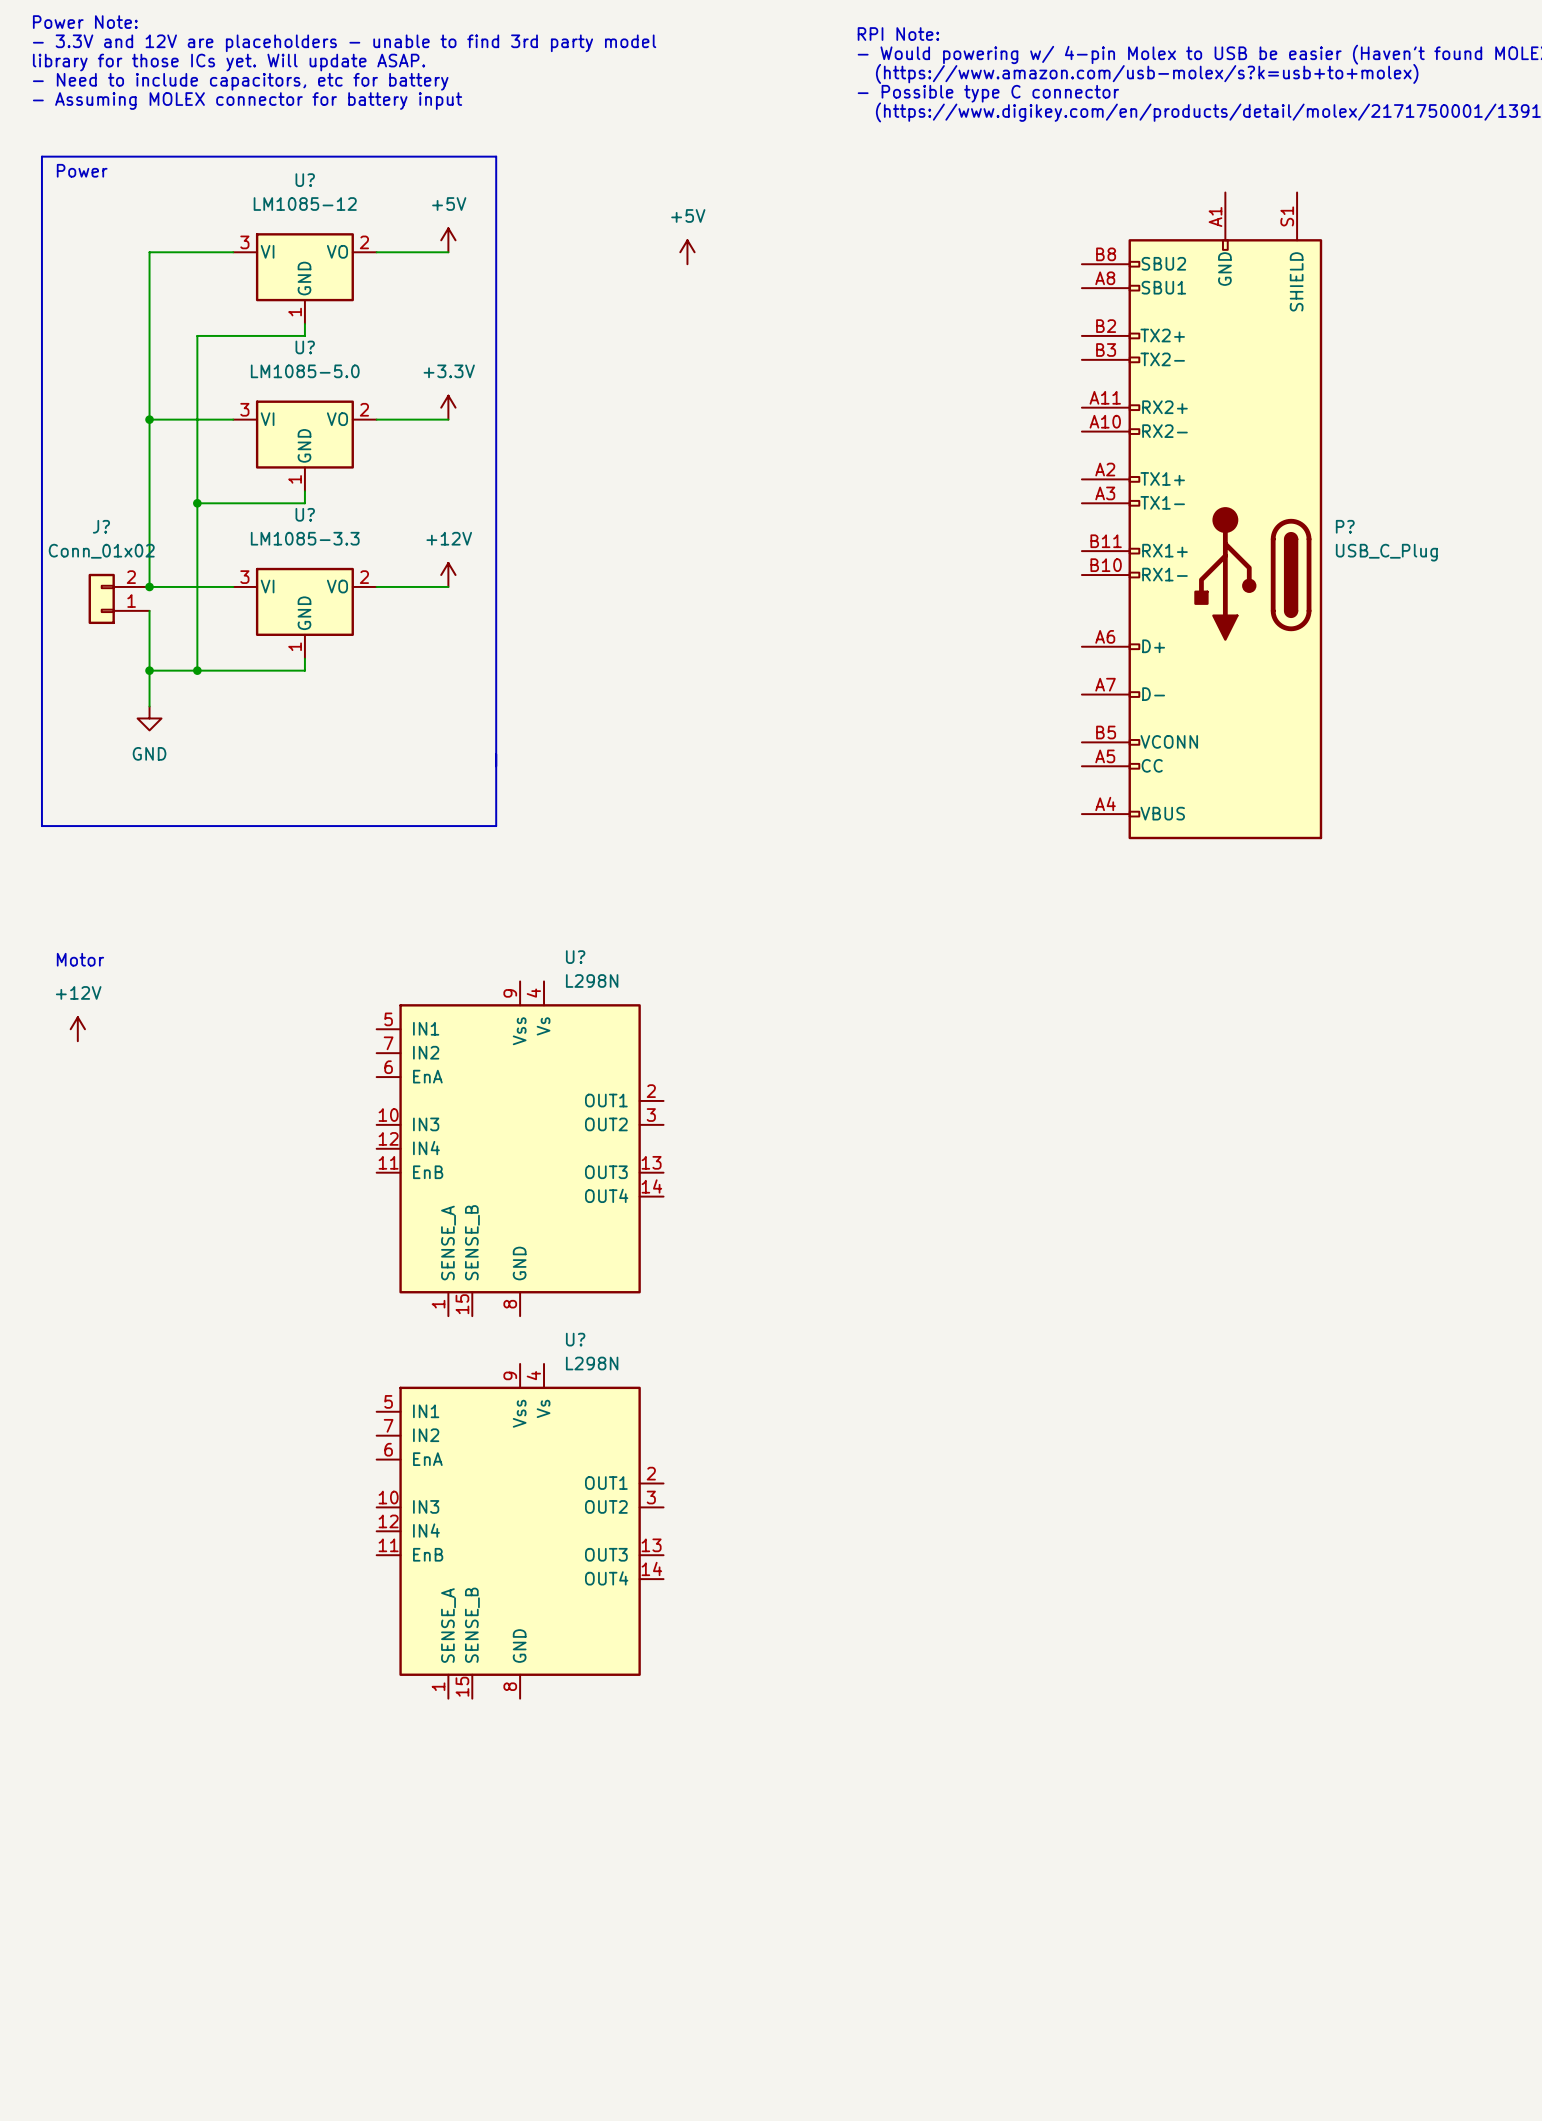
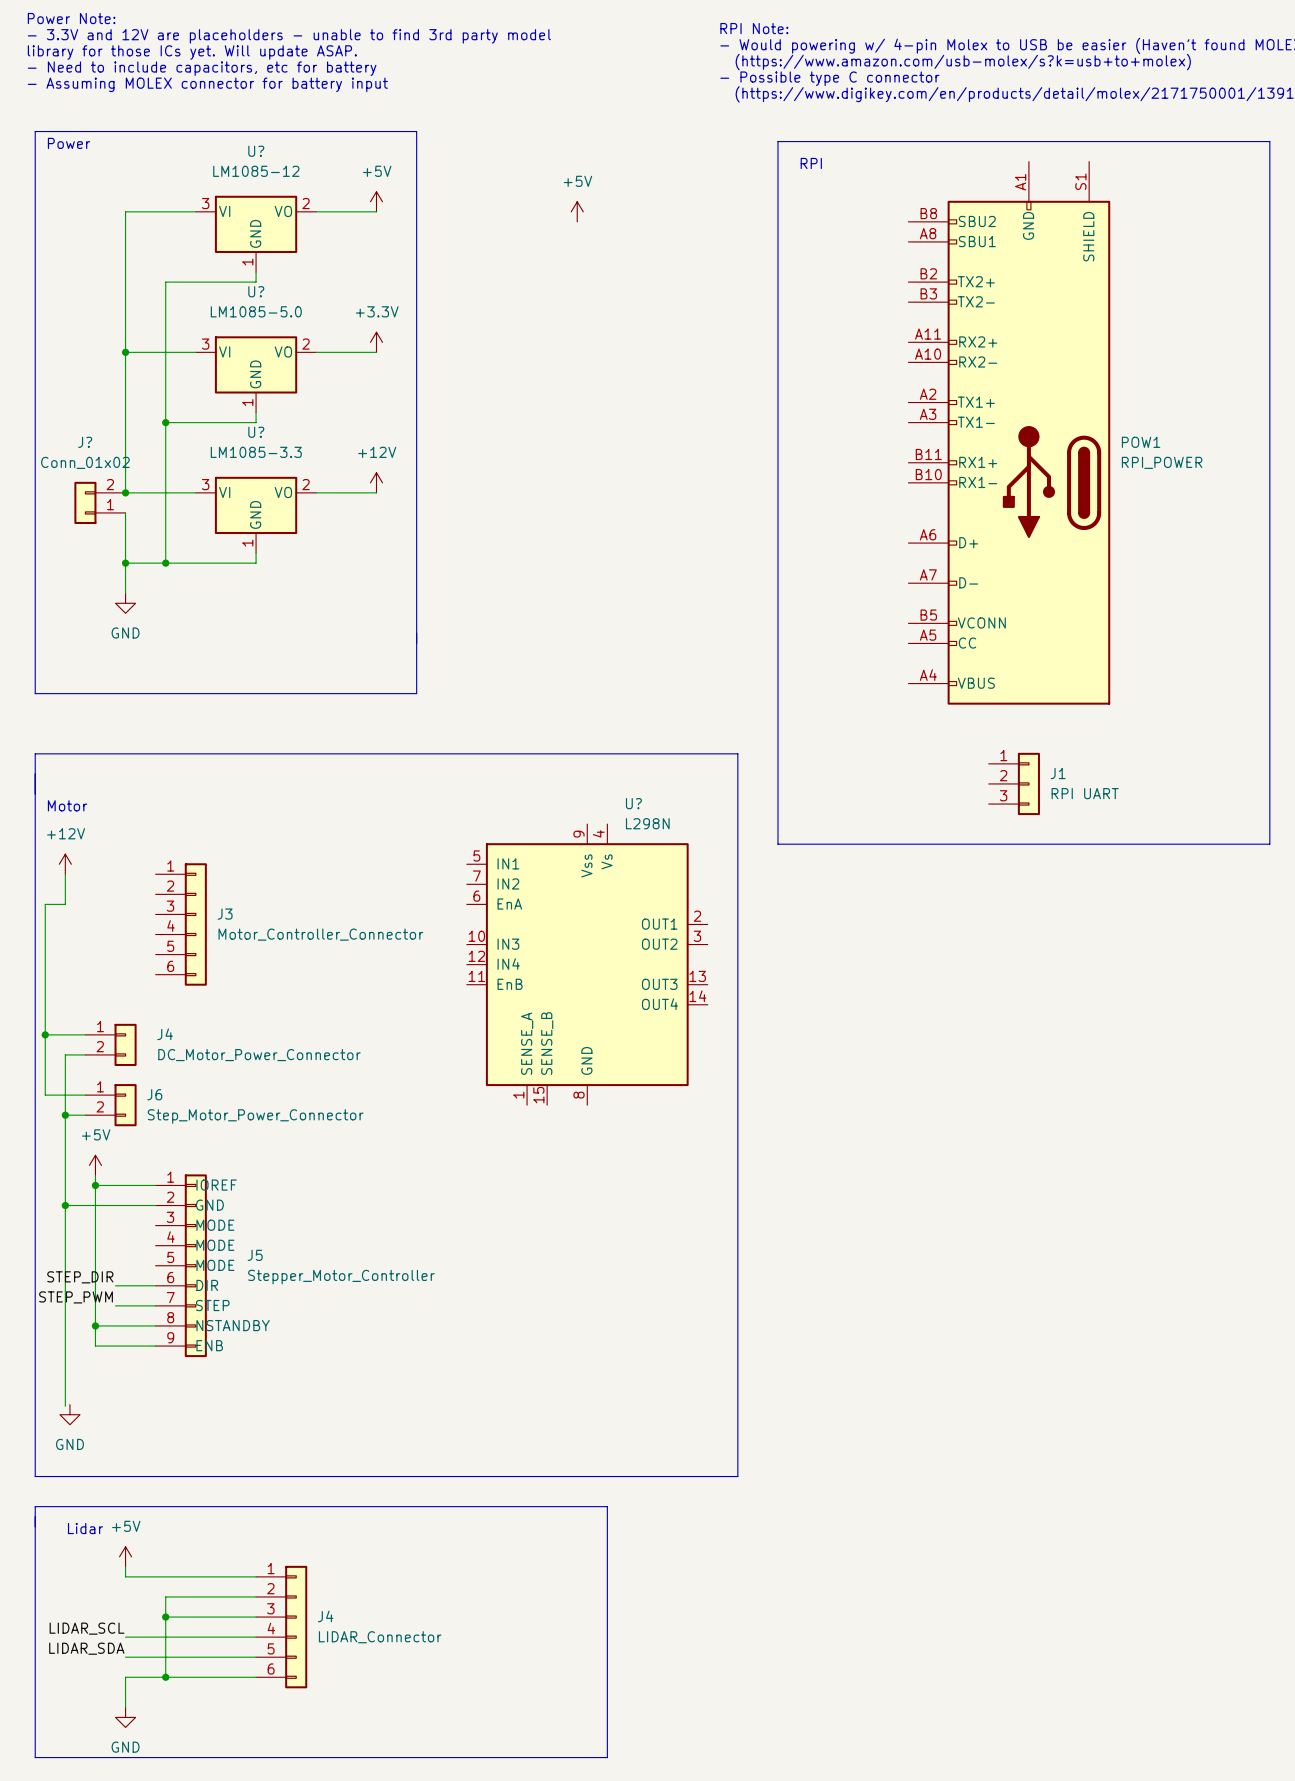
line: none -> (777, 141) (1269, 141) (1269, 844) (777, 844) (777, 141)
text: none -> RPI (811, 163)
P? name: P? (1345, 526) -> POW1 (1141, 442)
P? value: USB_C_Plug (1386, 552) -> RPI_POWER (1162, 462)
line: none -> (35, 753) (35, 1476) (737, 1476) (737, 753) (35, 753)
J1: none -> RPI UART (1014, 783)
wire: none -> (65, 874) (65, 904) (45, 904) (45, 1095) (85, 1095)
J3: none -> Motor_Controller_Connector (181, 924)
U? position: (520, 1148) -> (587, 964)
wire: none -> (45, 1034) (85, 1034)
junction: none -> (45, 1034)
J4: none -> DC_Motor_Power_Connector (111, 1044)
wire: none -> (85, 1054) (65, 1054) (65, 1406)
J6: none -> Step_Motor_Power_Connector (111, 1105)
wire: none -> (65, 1115) (85, 1115)
junction: none -> (65, 1115)
power symbol: none -> +5V (95, 1165)
wire: none -> (95, 1175) (95, 1346) (155, 1346)
wire: none -> (95, 1185) (155, 1185)
junction: none -> (95, 1185)
wire: none -> (65, 1205) (155, 1205)
junction: none -> (65, 1205)
J5: none -> Stepper_Motor_Controller (181, 1265)
label: none -> STEP_DIR (80, 1277)
wire: none -> (115, 1285) (155, 1285)
U?: L298N (520, 1531) -> none
label: none -> STEP_PWM (76, 1297)
wire: none -> (115, 1305) (155, 1305)
wire: none -> (95, 1325) (155, 1325)
junction: none -> (95, 1325)
power symbol: none -> GND (69, 1414)
line: none -> (35, 1506) (35, 1757) (607, 1757) (607, 1506) (35, 1506)
text: none -> Lidar (85, 1528)
power symbol: none -> +5V (125, 1556)
wire: none -> (125, 1566) (125, 1576) (256, 1576)
wire: none -> (256, 1596) (165, 1596) (165, 1677)
wire: none -> (165, 1617) (256, 1617)
junction: none -> (165, 1617)
J4: none -> LIDAR_Connector (281, 1627)
label: none -> LIDAR_SCL (87, 1628)
wire: none -> (125, 1637) (256, 1637)
label: none -> LIDAR_SDA (86, 1648)
wire: none -> (125, 1657) (256, 1657)
junction: none -> (165, 1677)
wire: none -> (256, 1677) (125, 1677) (125, 1707)
power symbol: none -> GND (125, 1717)

